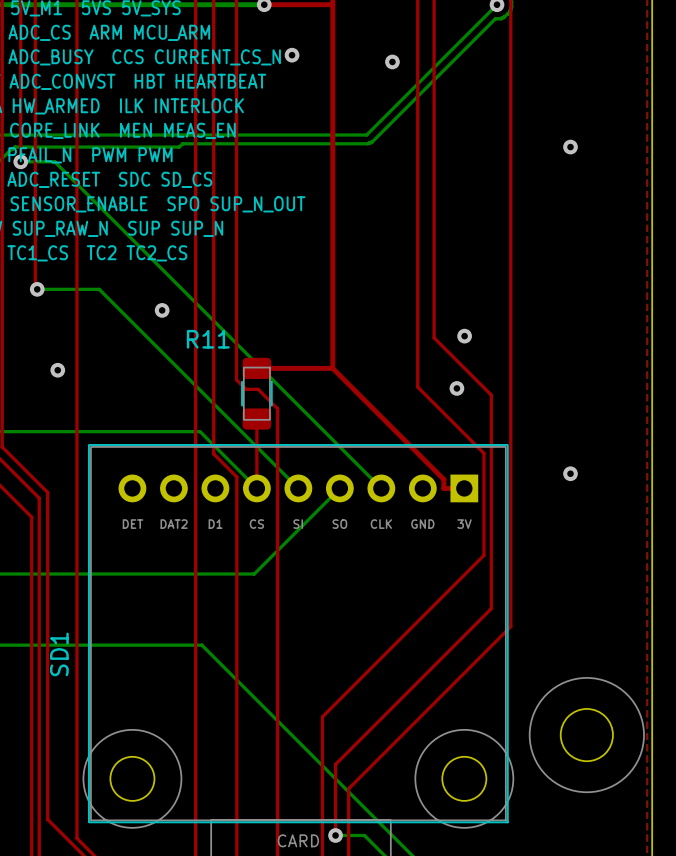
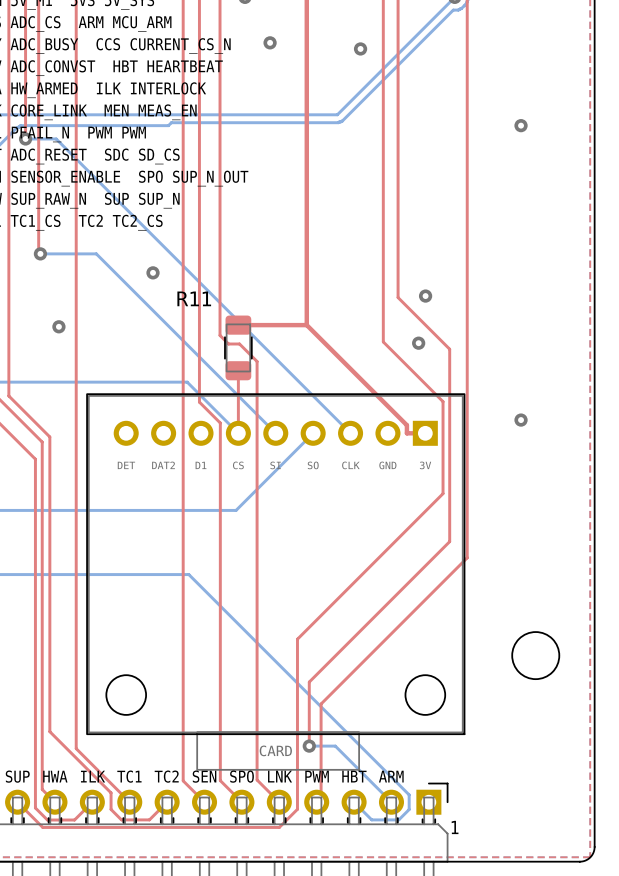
SD1 name: SD1 (59, 654) -> none
drawing: [414, 677, 645, 829] -> none
drawing: [82, 729, 183, 829] -> none

